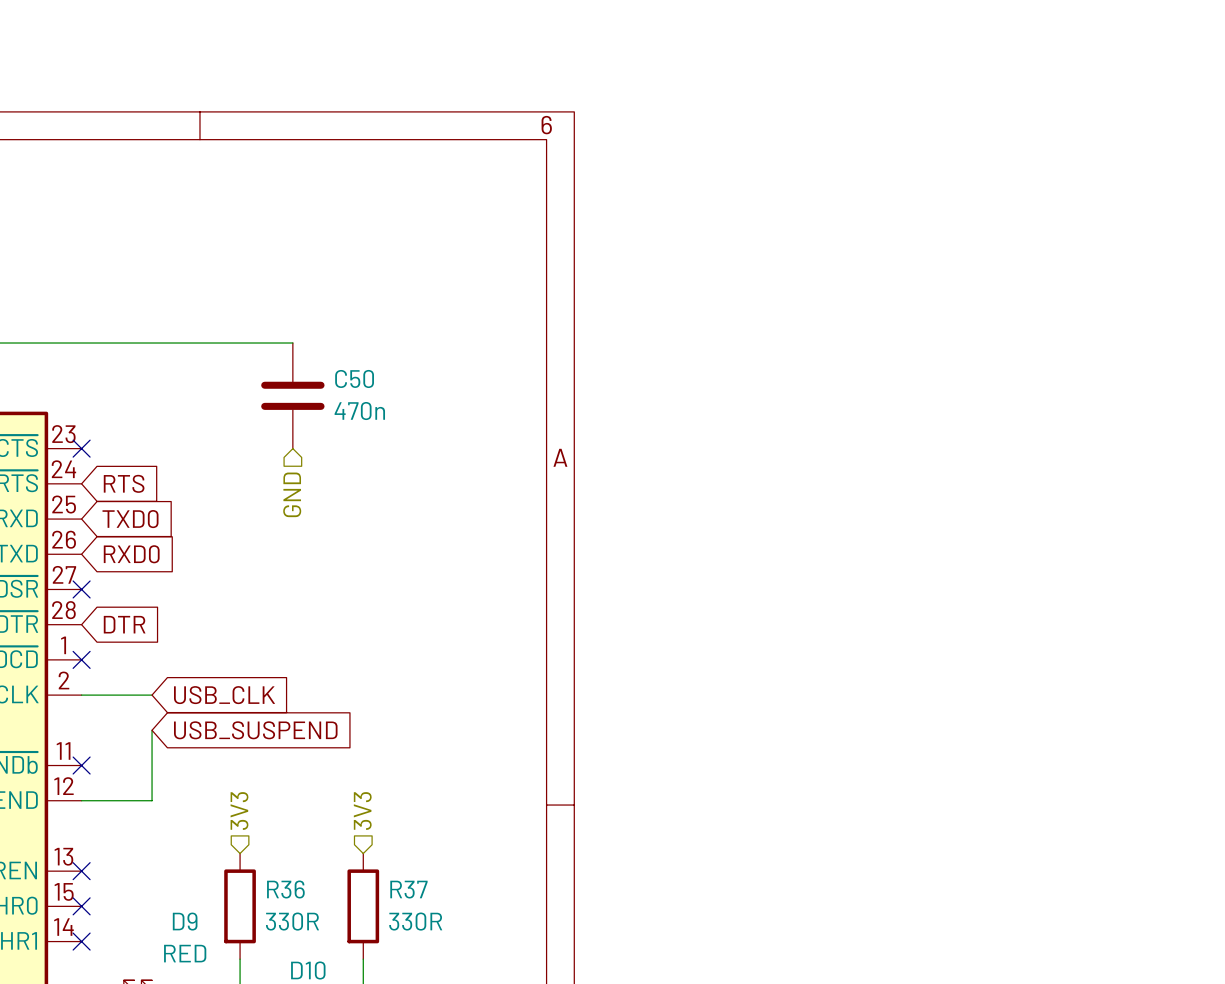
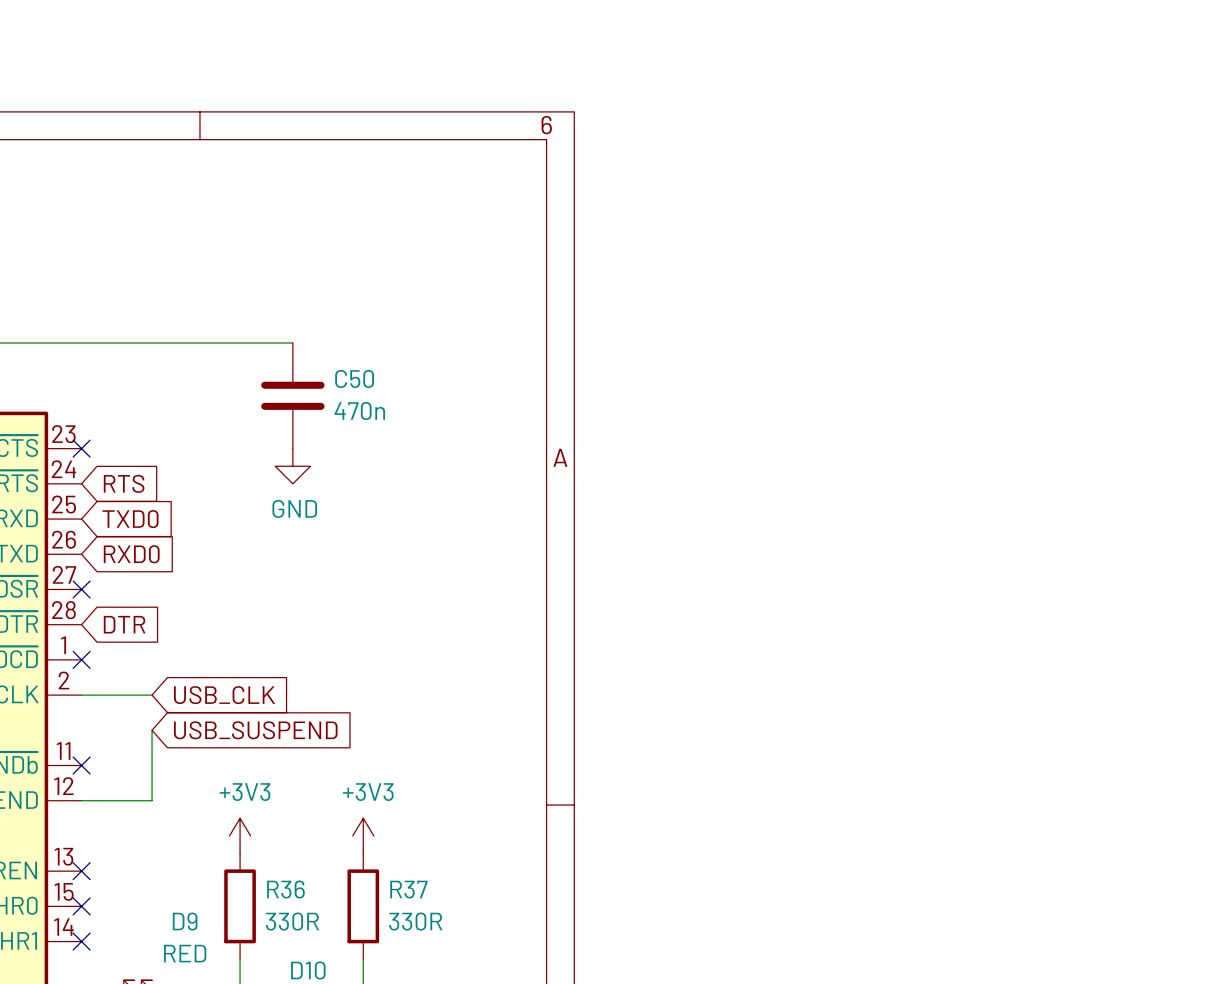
power symbol: none -> GND (292, 466)
hierarchical label: GND (292, 494) -> none
hierarchical label: 3V3 (239, 811) -> none
hierarchical label: 3V3 (362, 811) -> none
power symbol: none -> +3V3 (240, 835)
power symbol: none -> +3V3 (363, 835)

